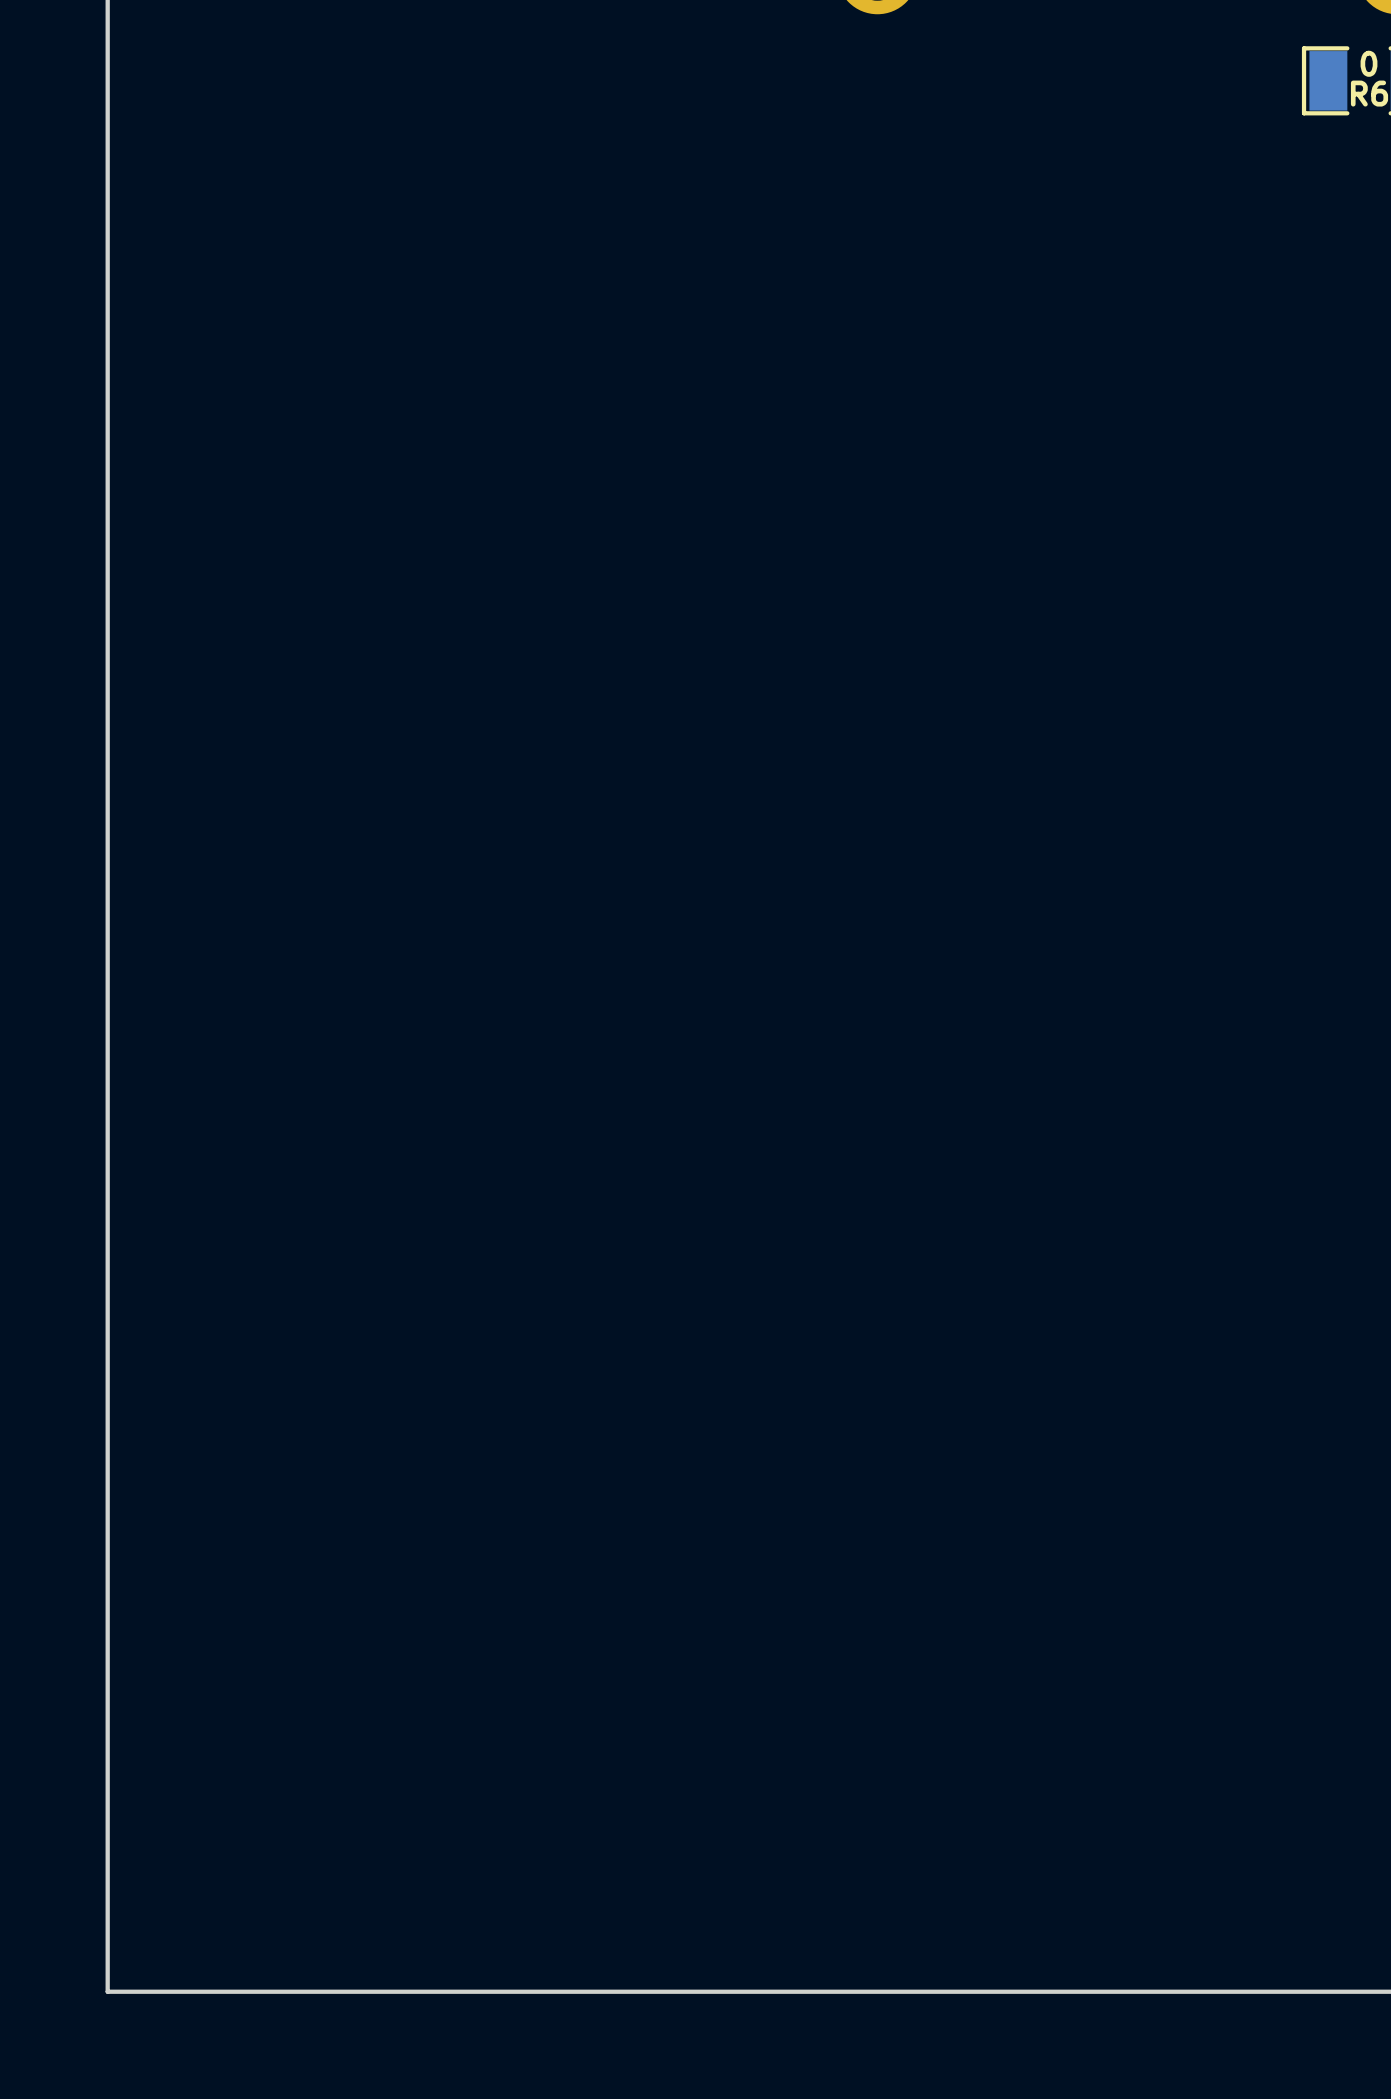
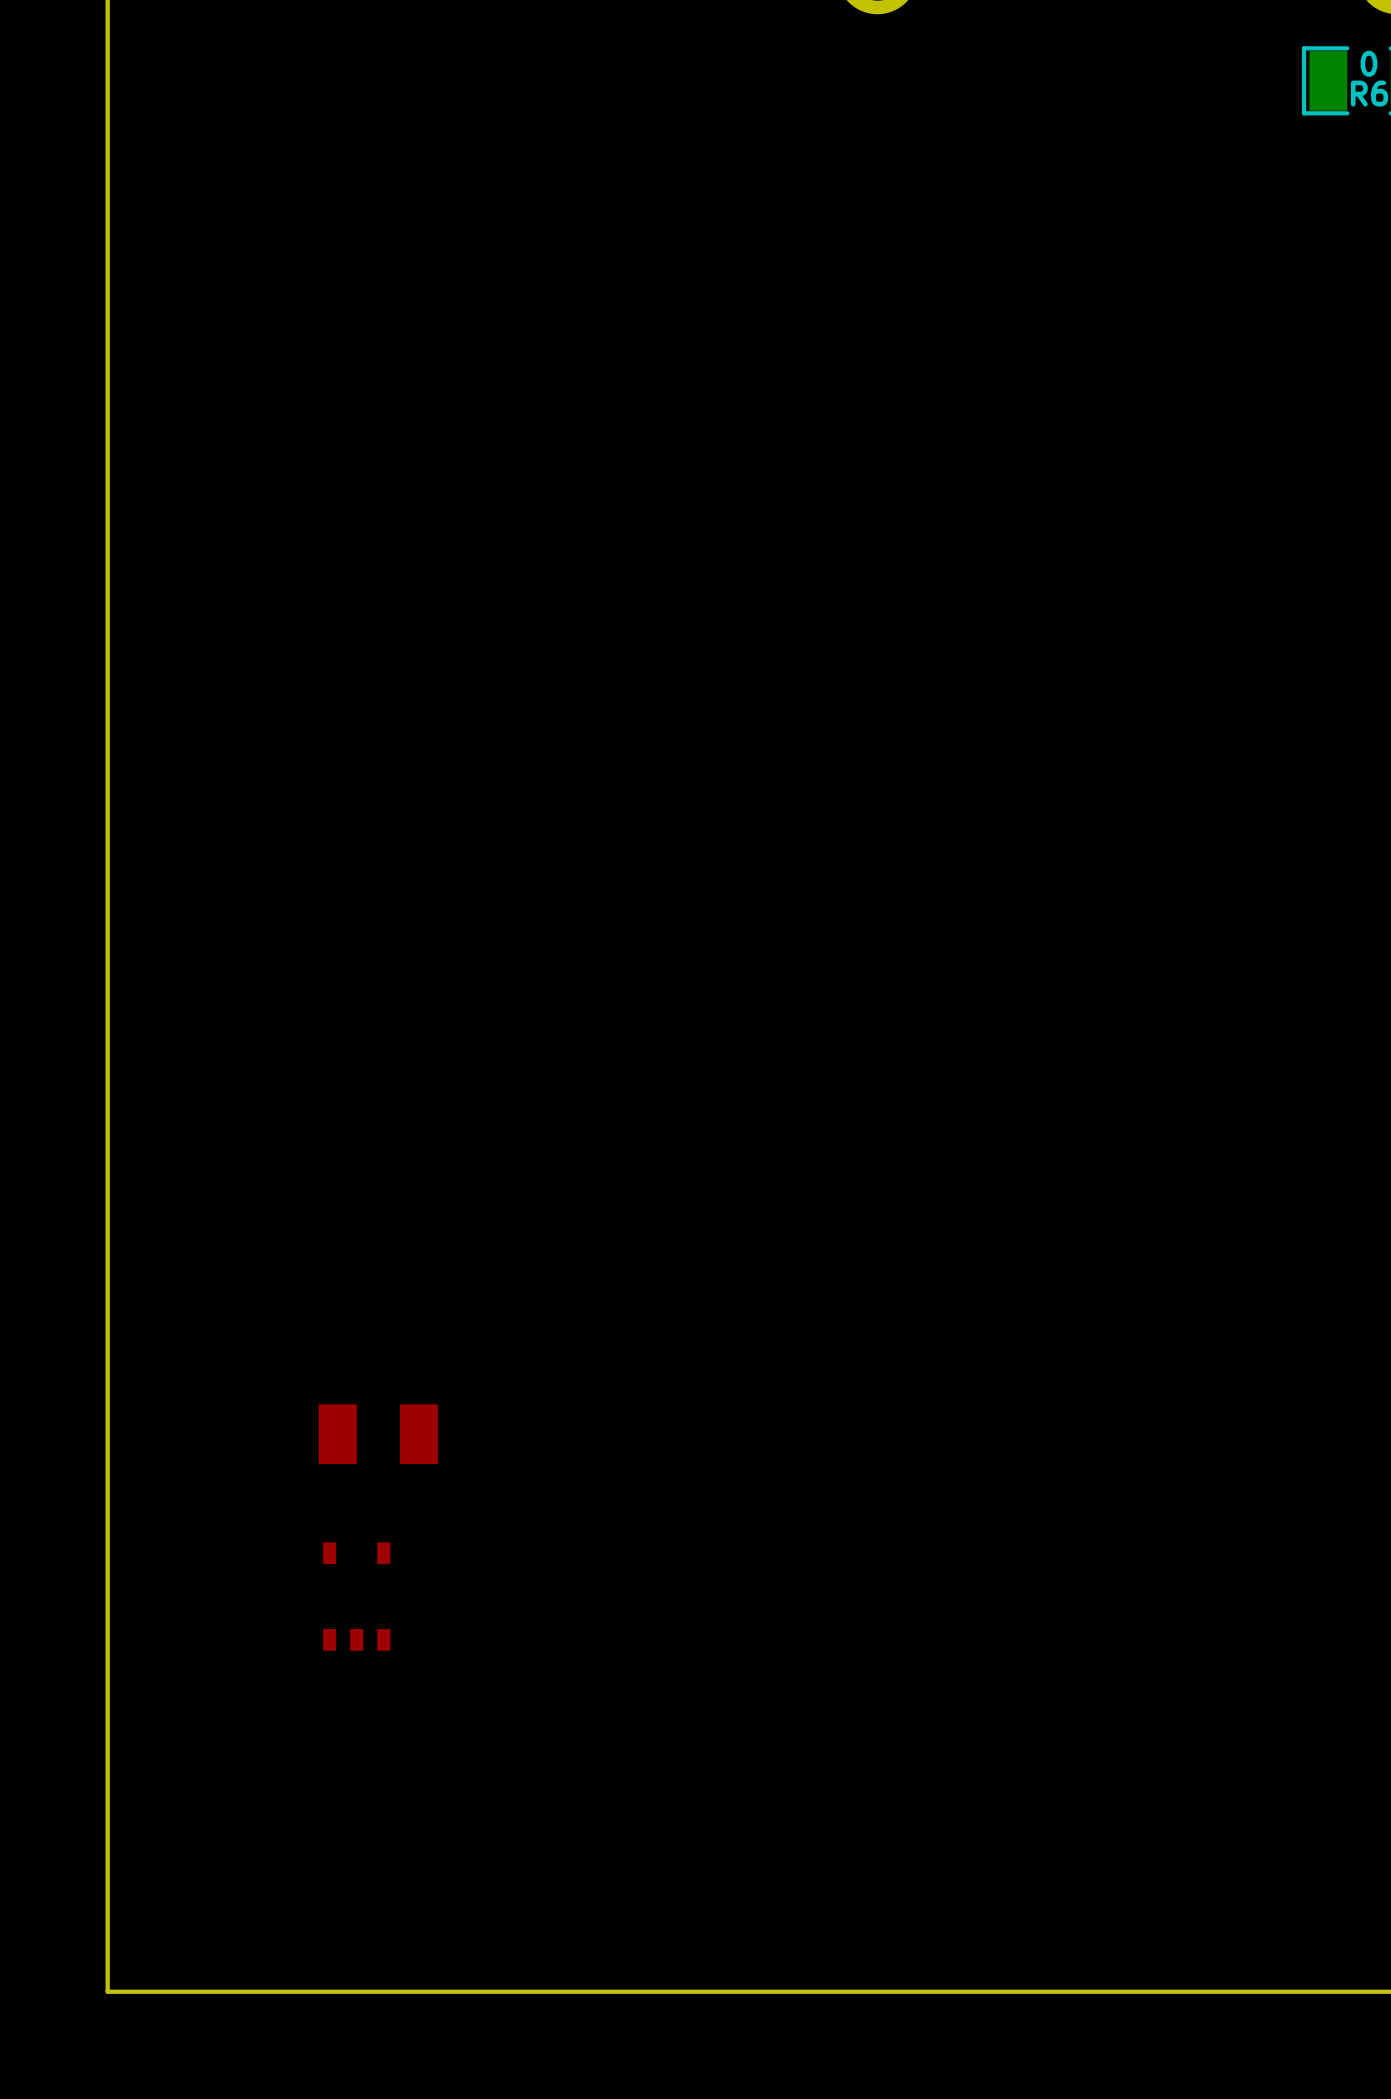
part: none -> (378, 1434)
part: none -> (356, 1596)

